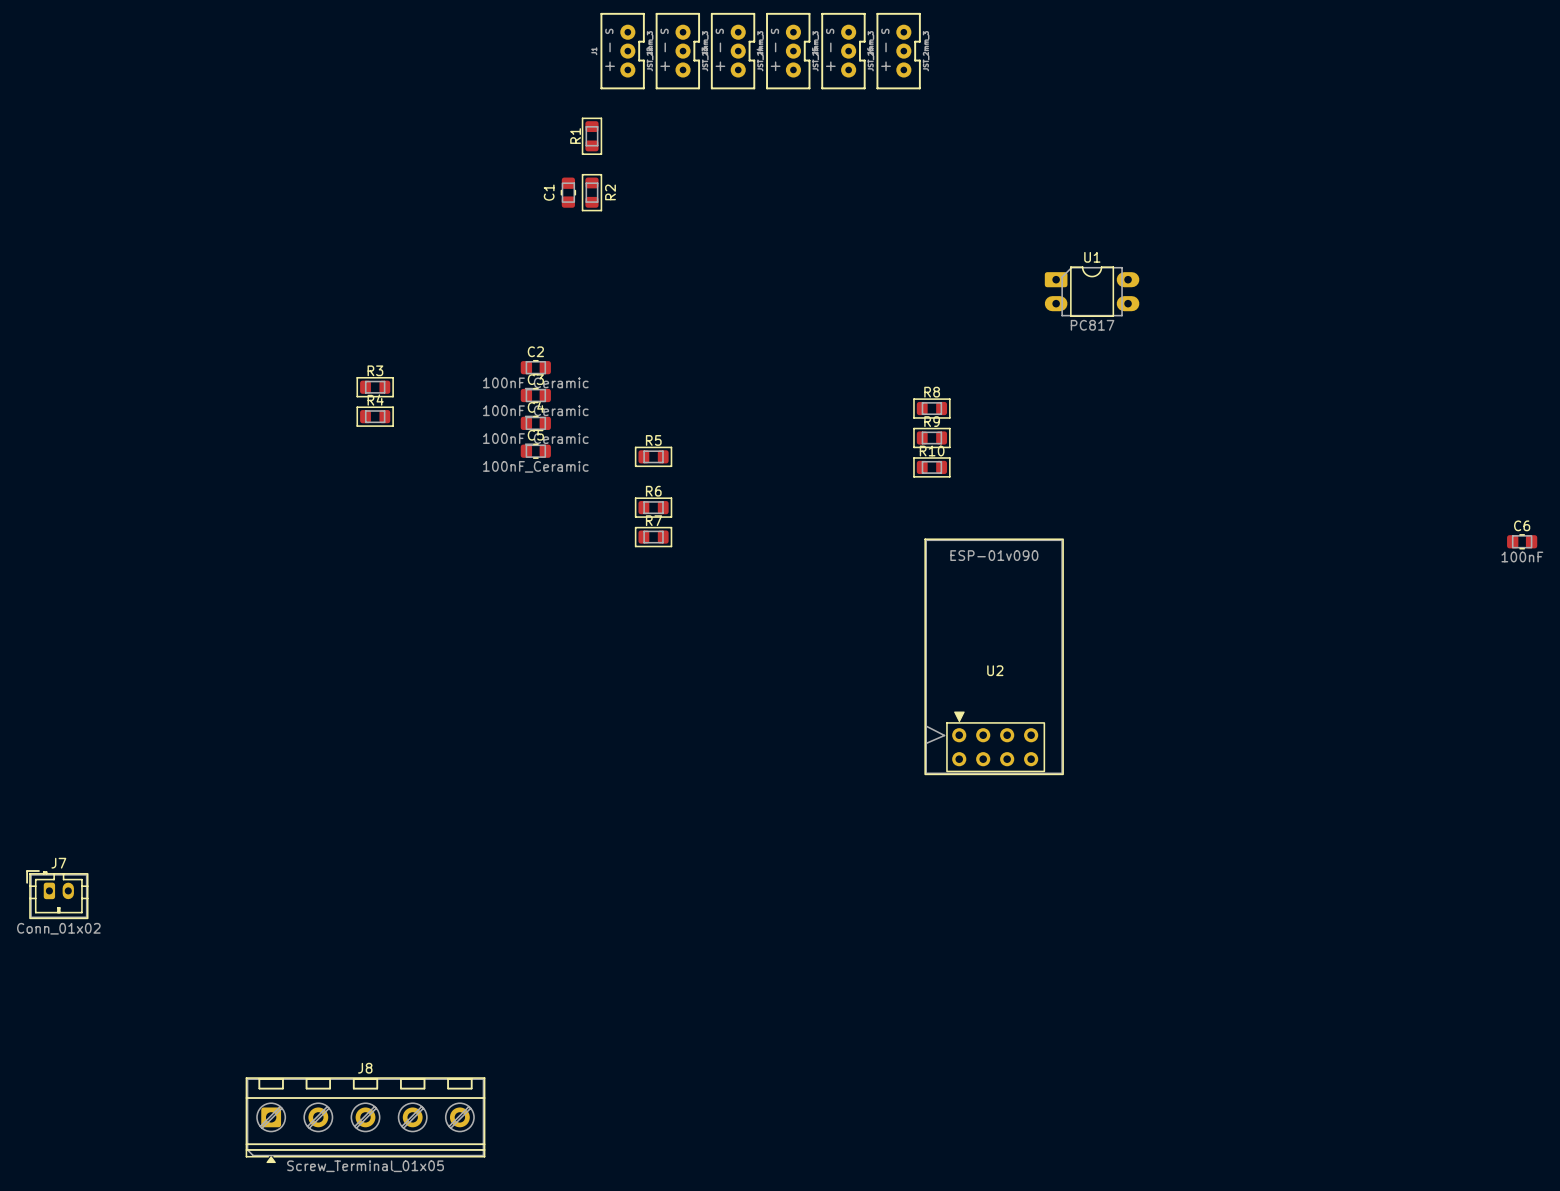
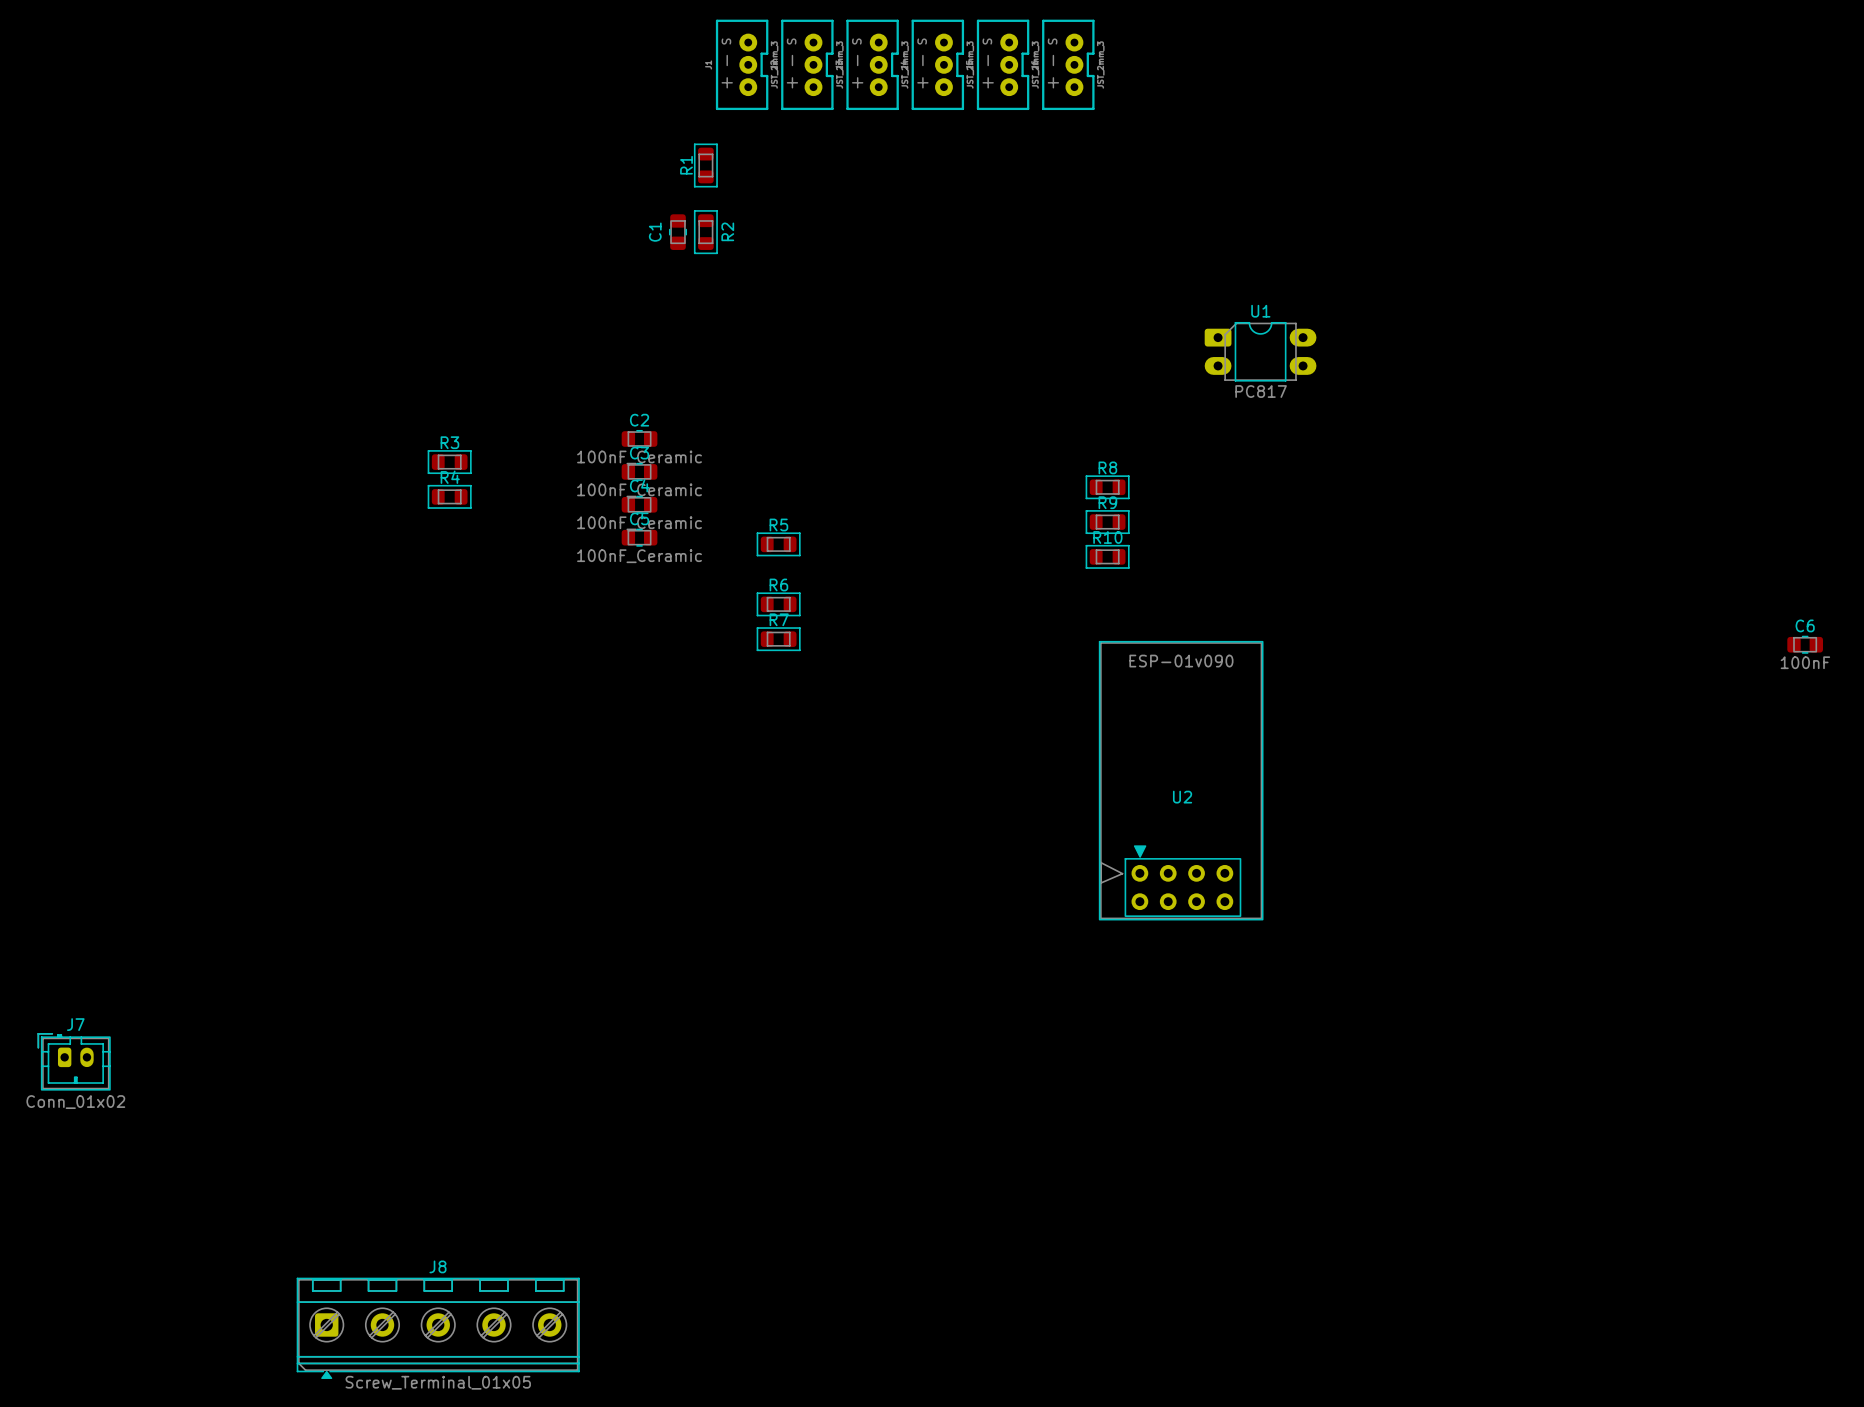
U1 position: (1092, 291) -> (1260, 351)

